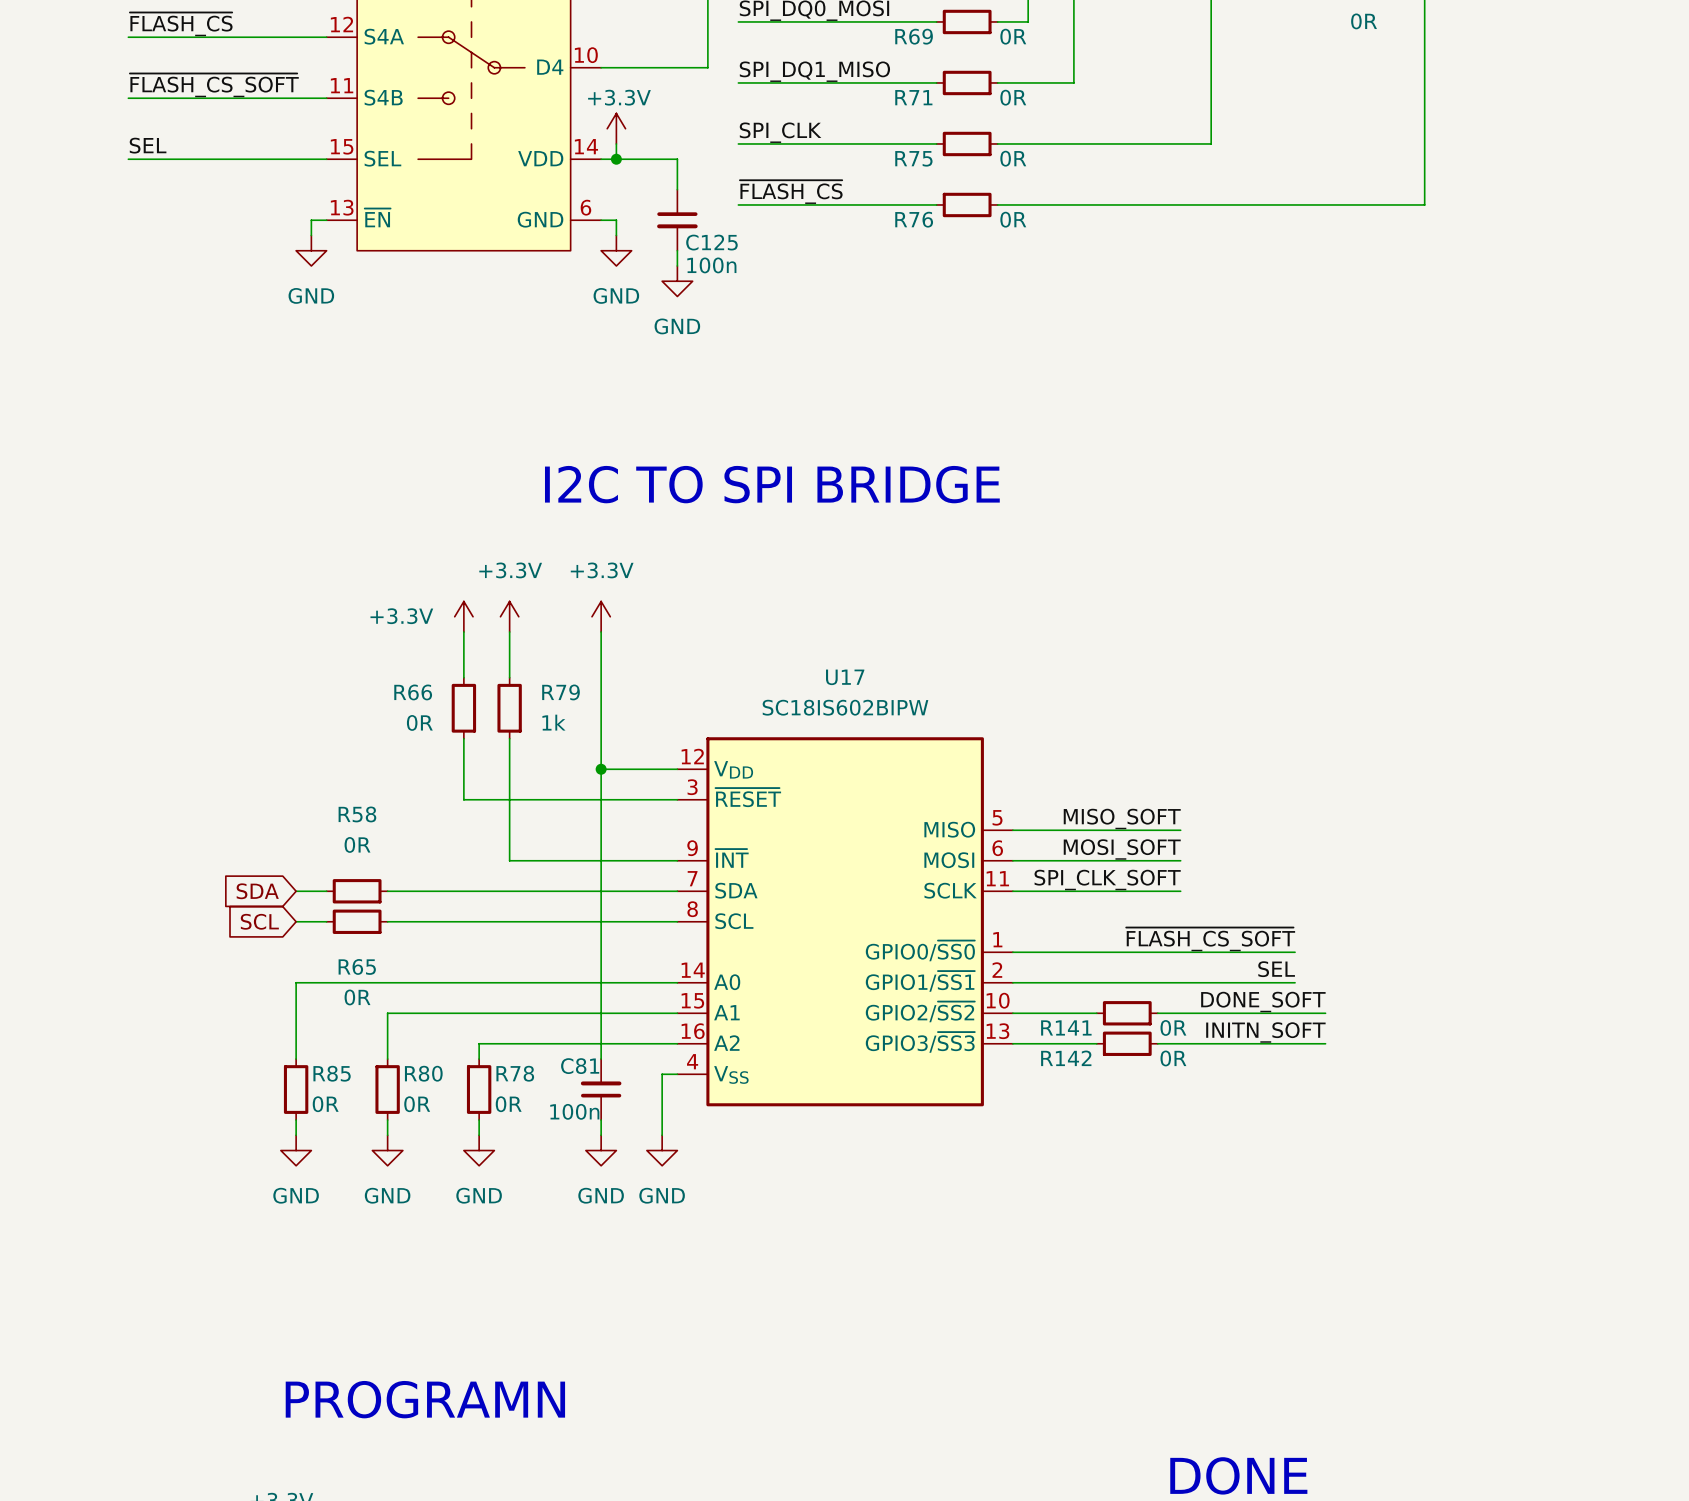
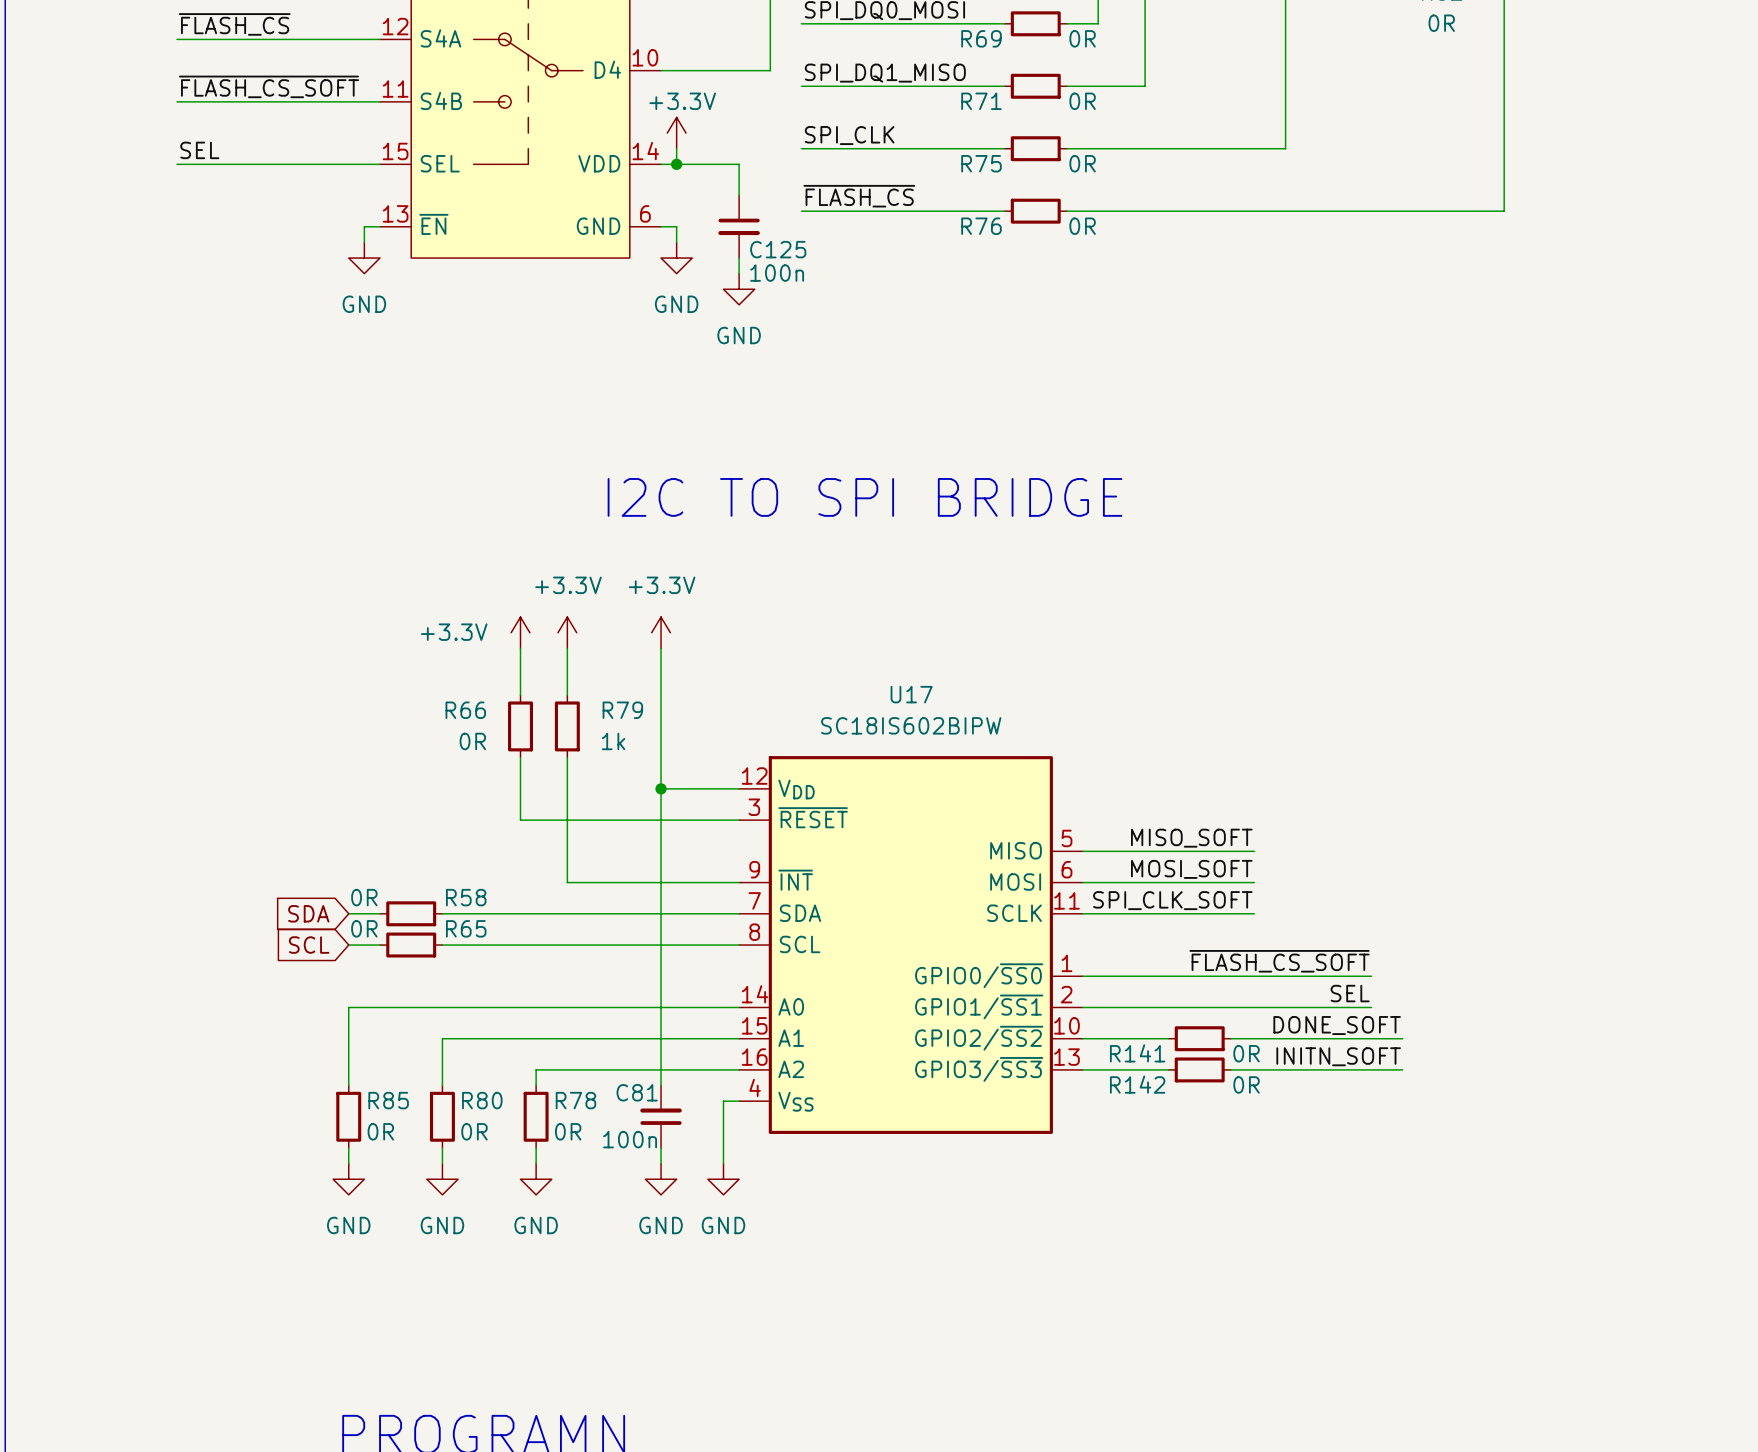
R58 name position: R58 (357, 814) -> R58 (466, 897)
R58 text position: 0R (357, 844) -> 0R (364, 897)
R65 name position: R65 (357, 966) -> R65 (466, 928)
R65 text position: 0R (357, 997) -> 0R (364, 928)

